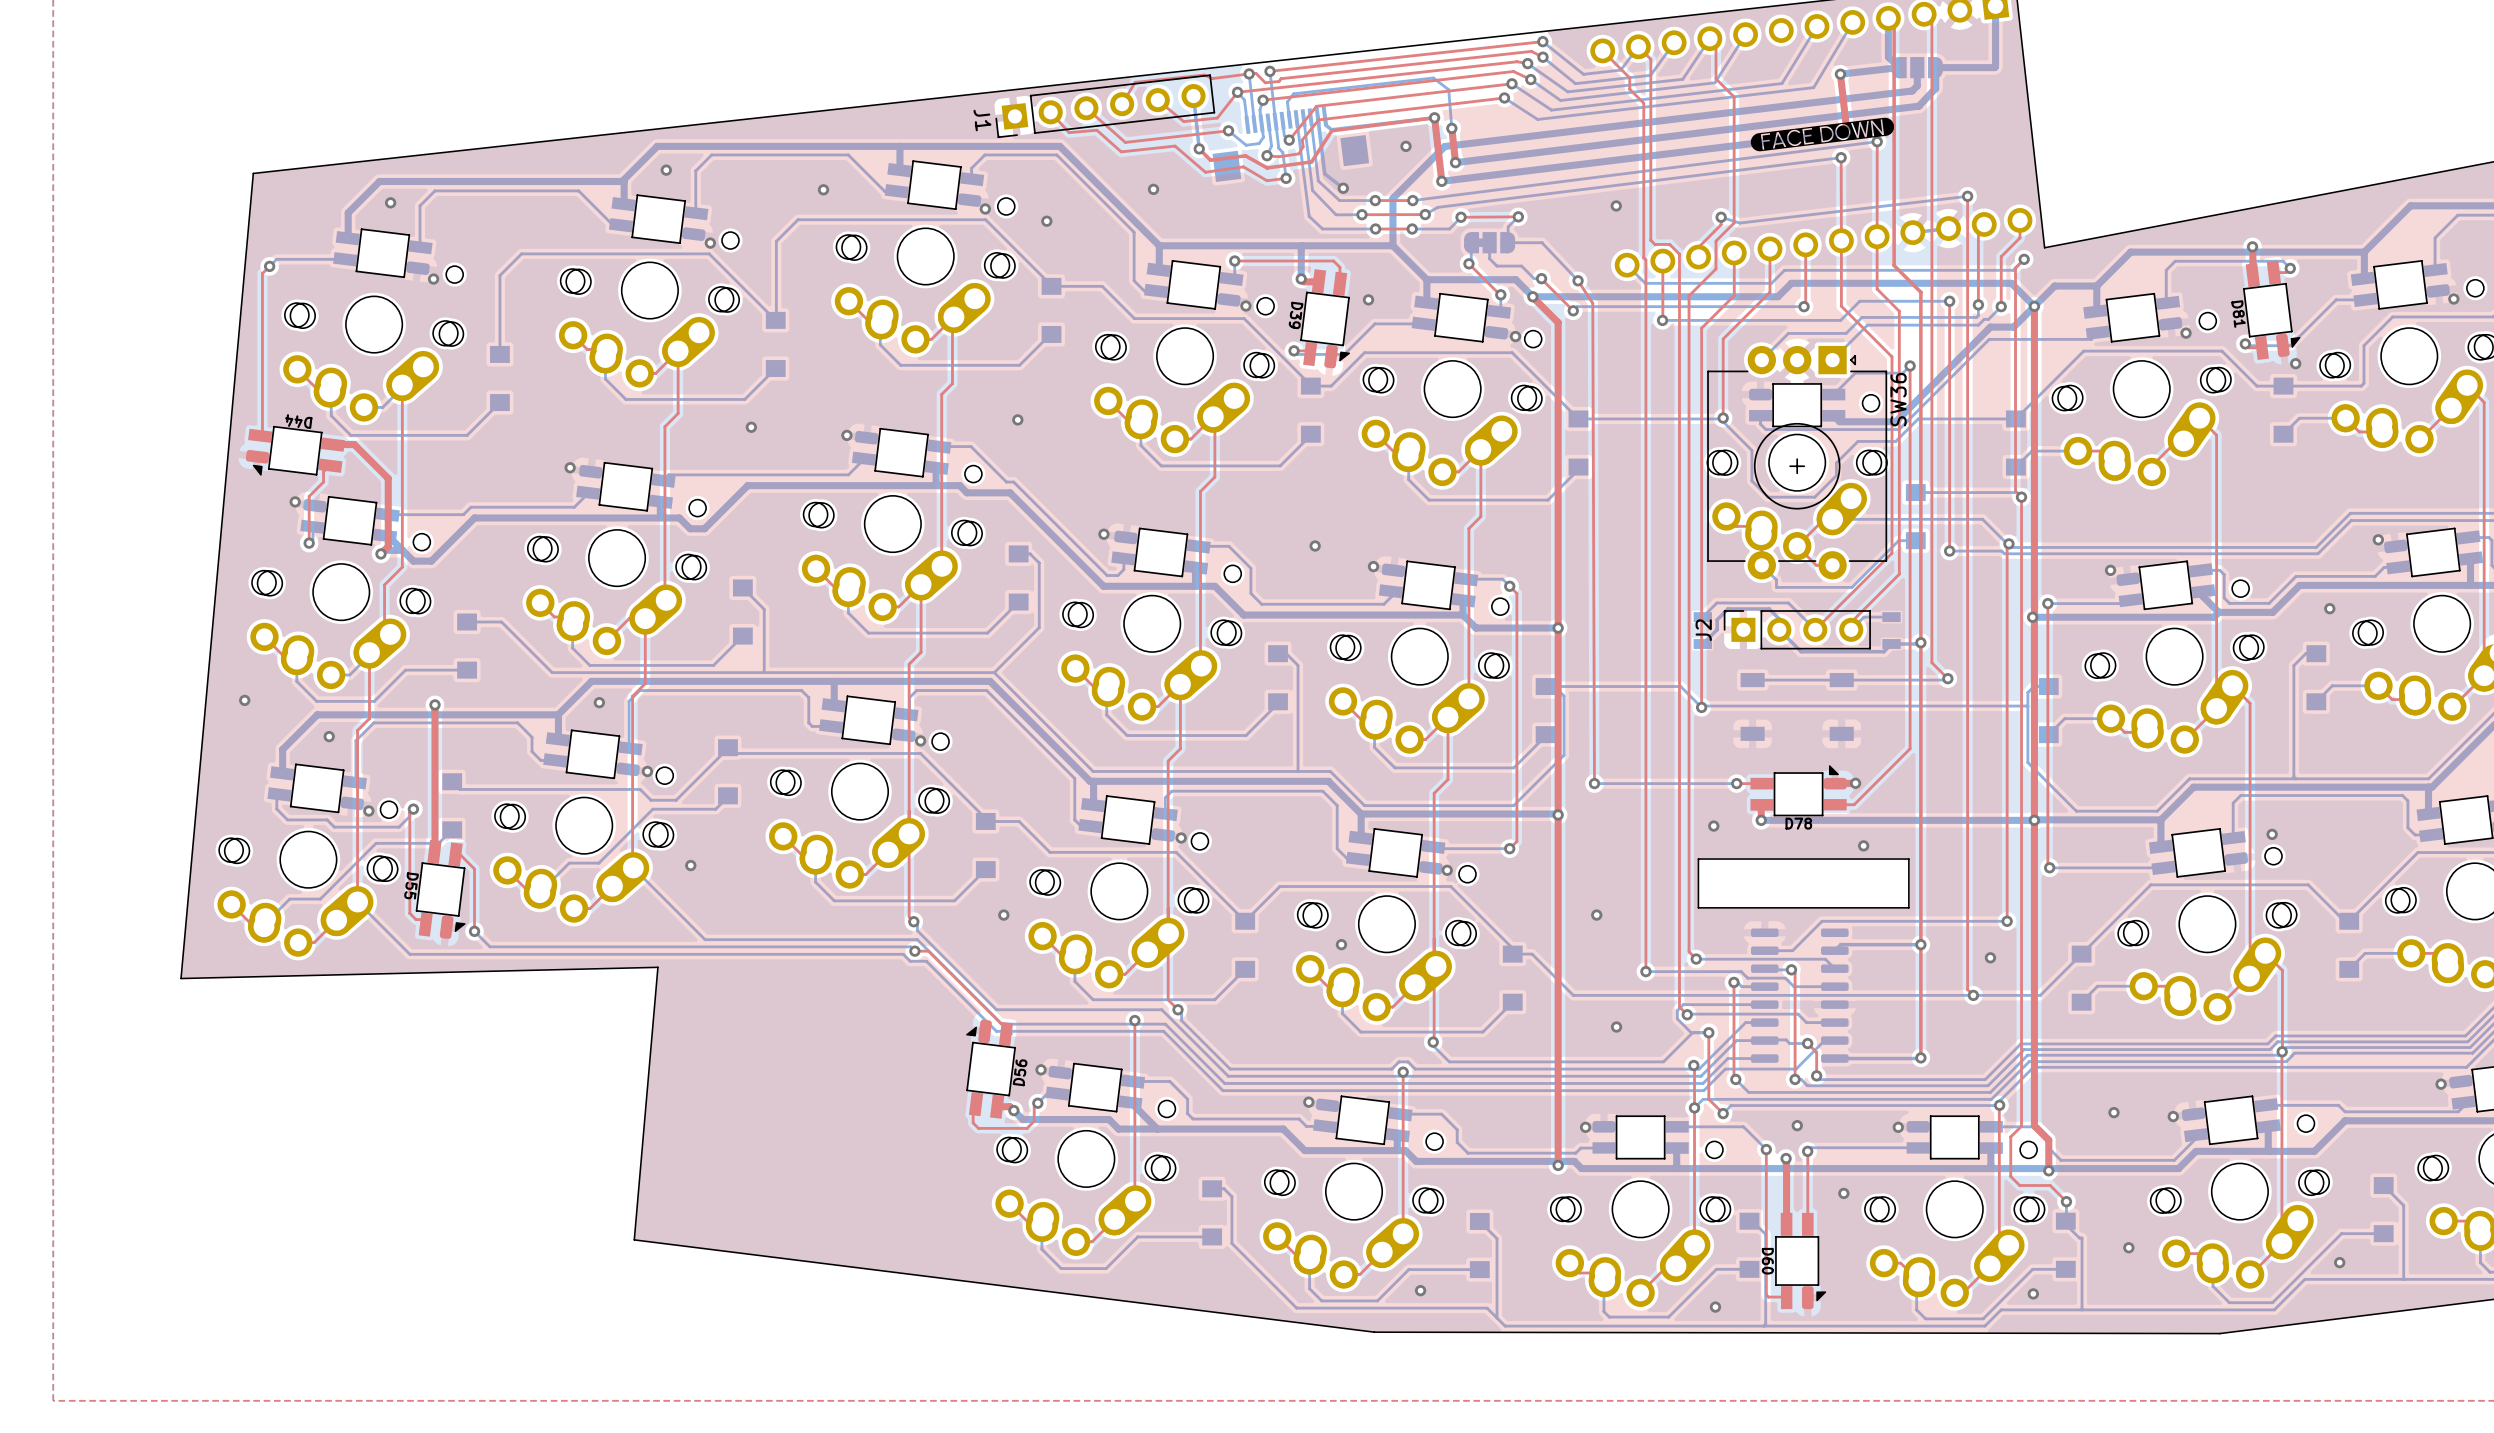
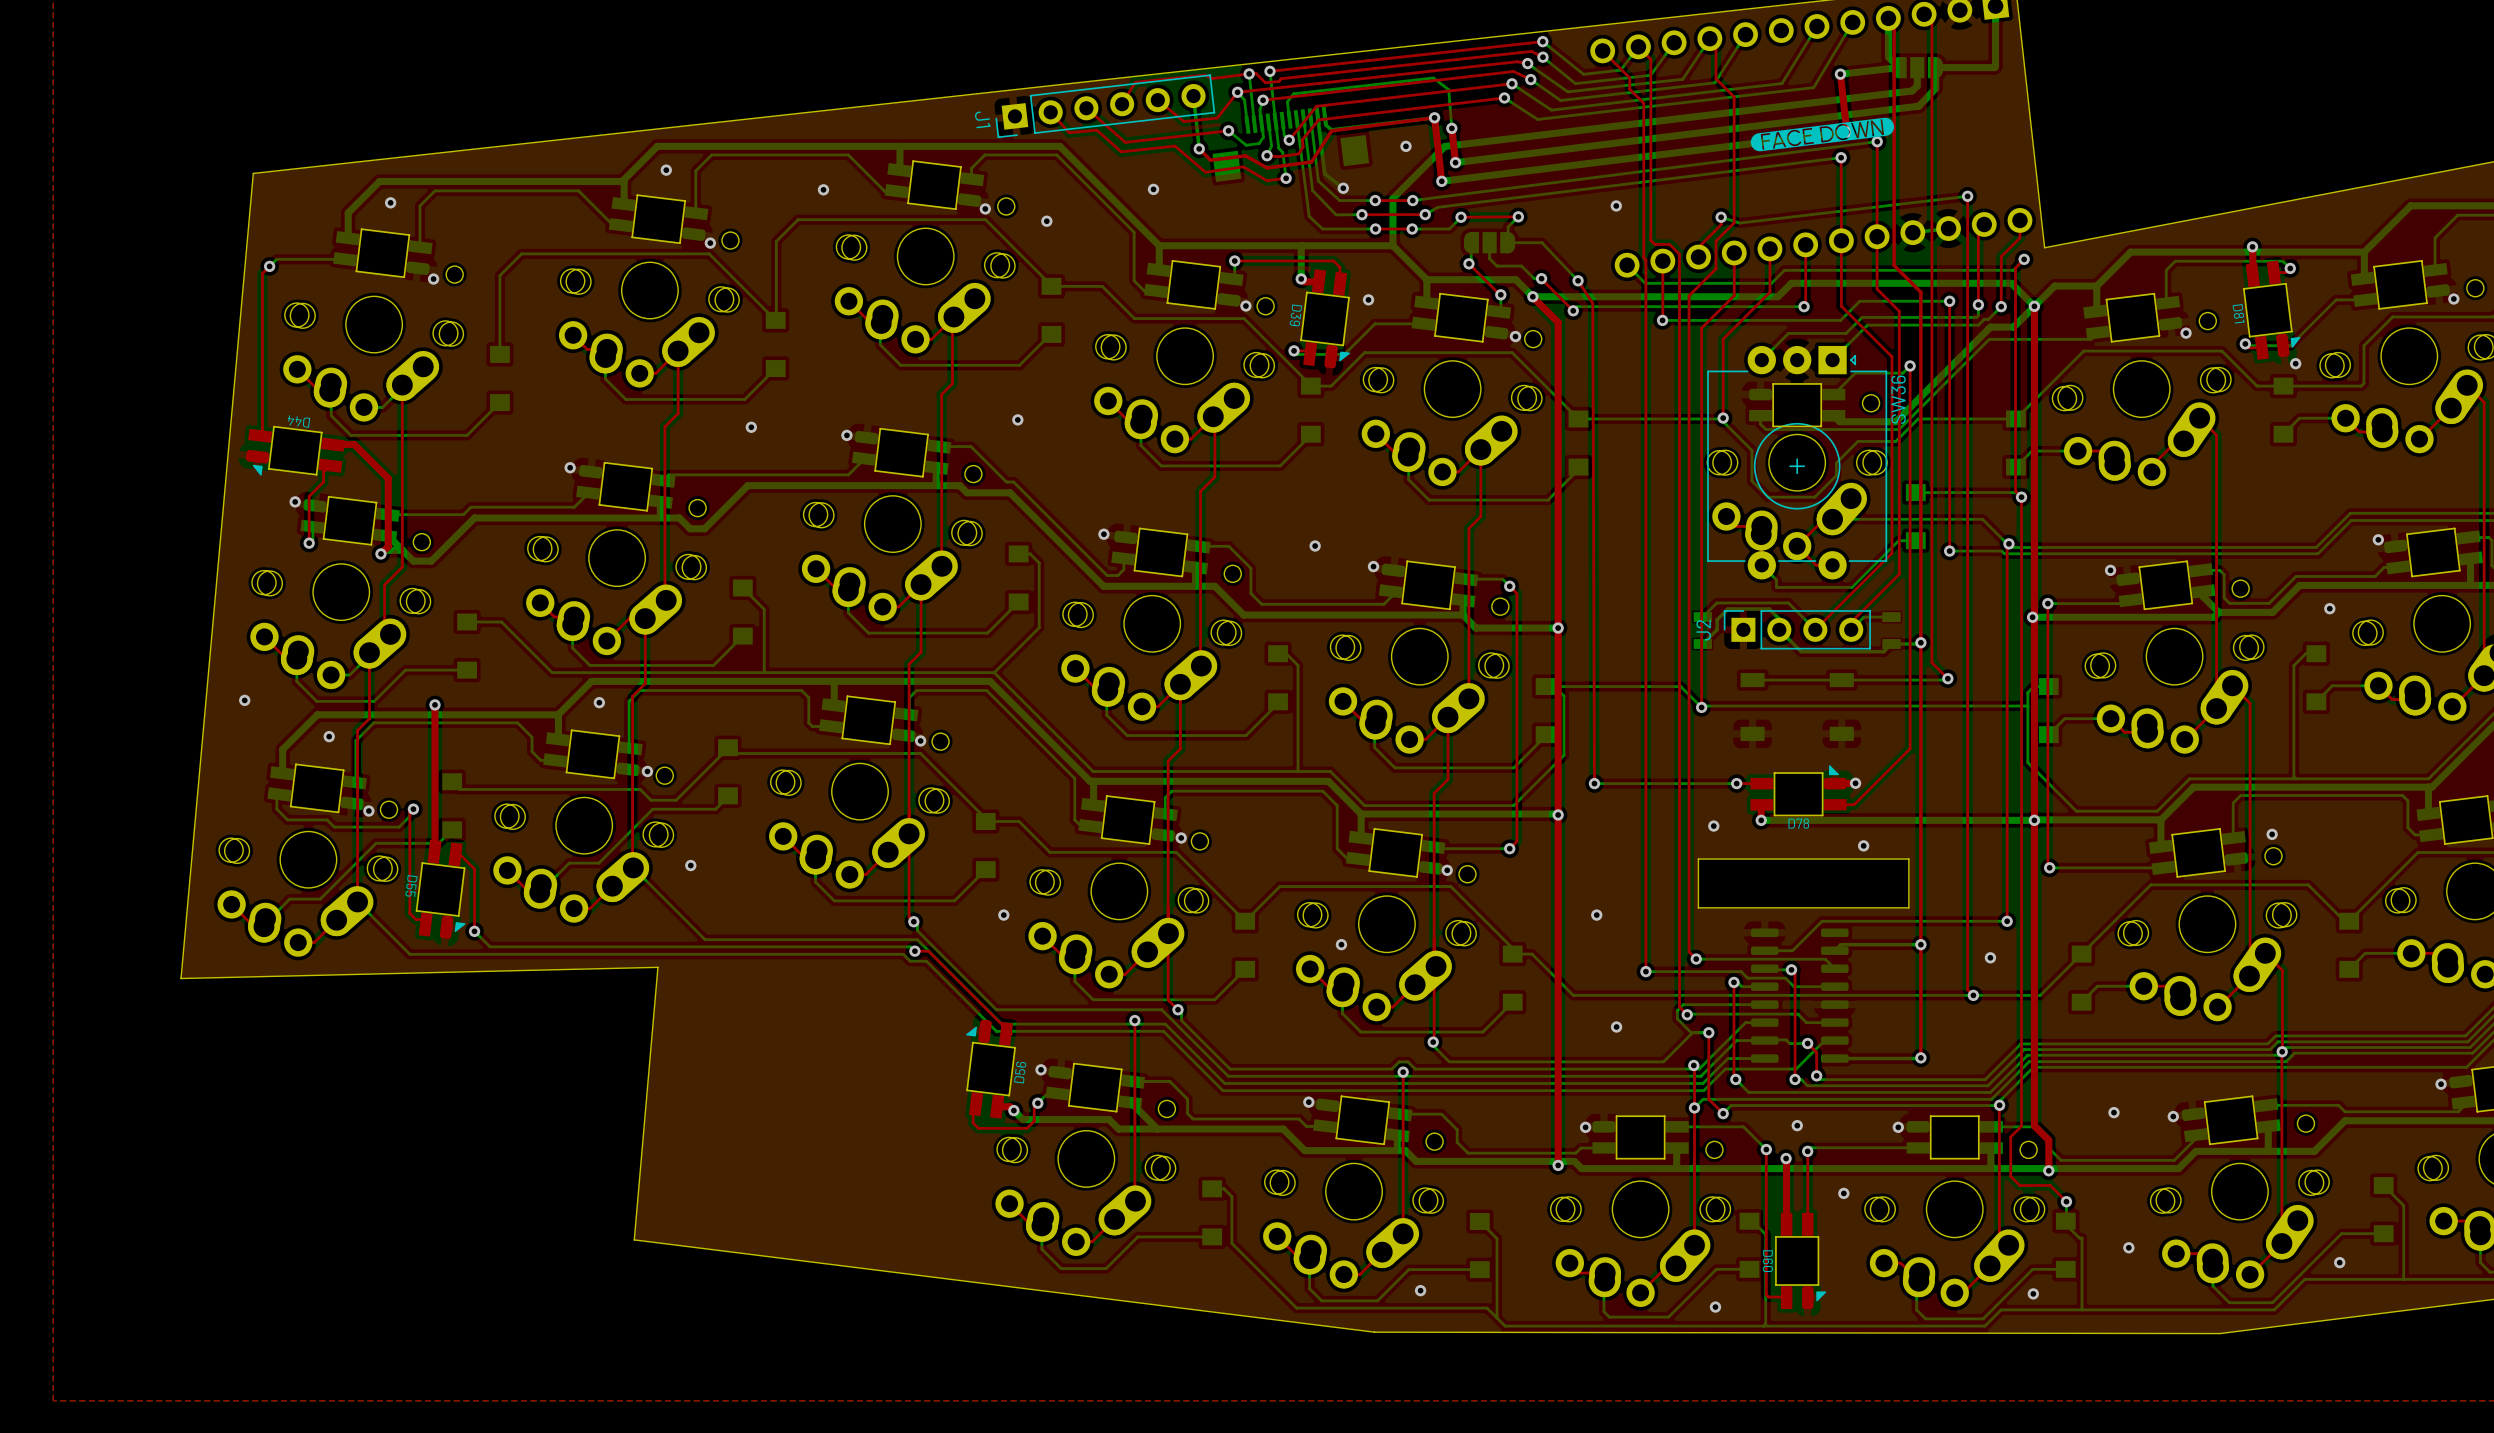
part footprint: [1464, 232, 1516, 254] -> [1464, 232, 1516, 254]

